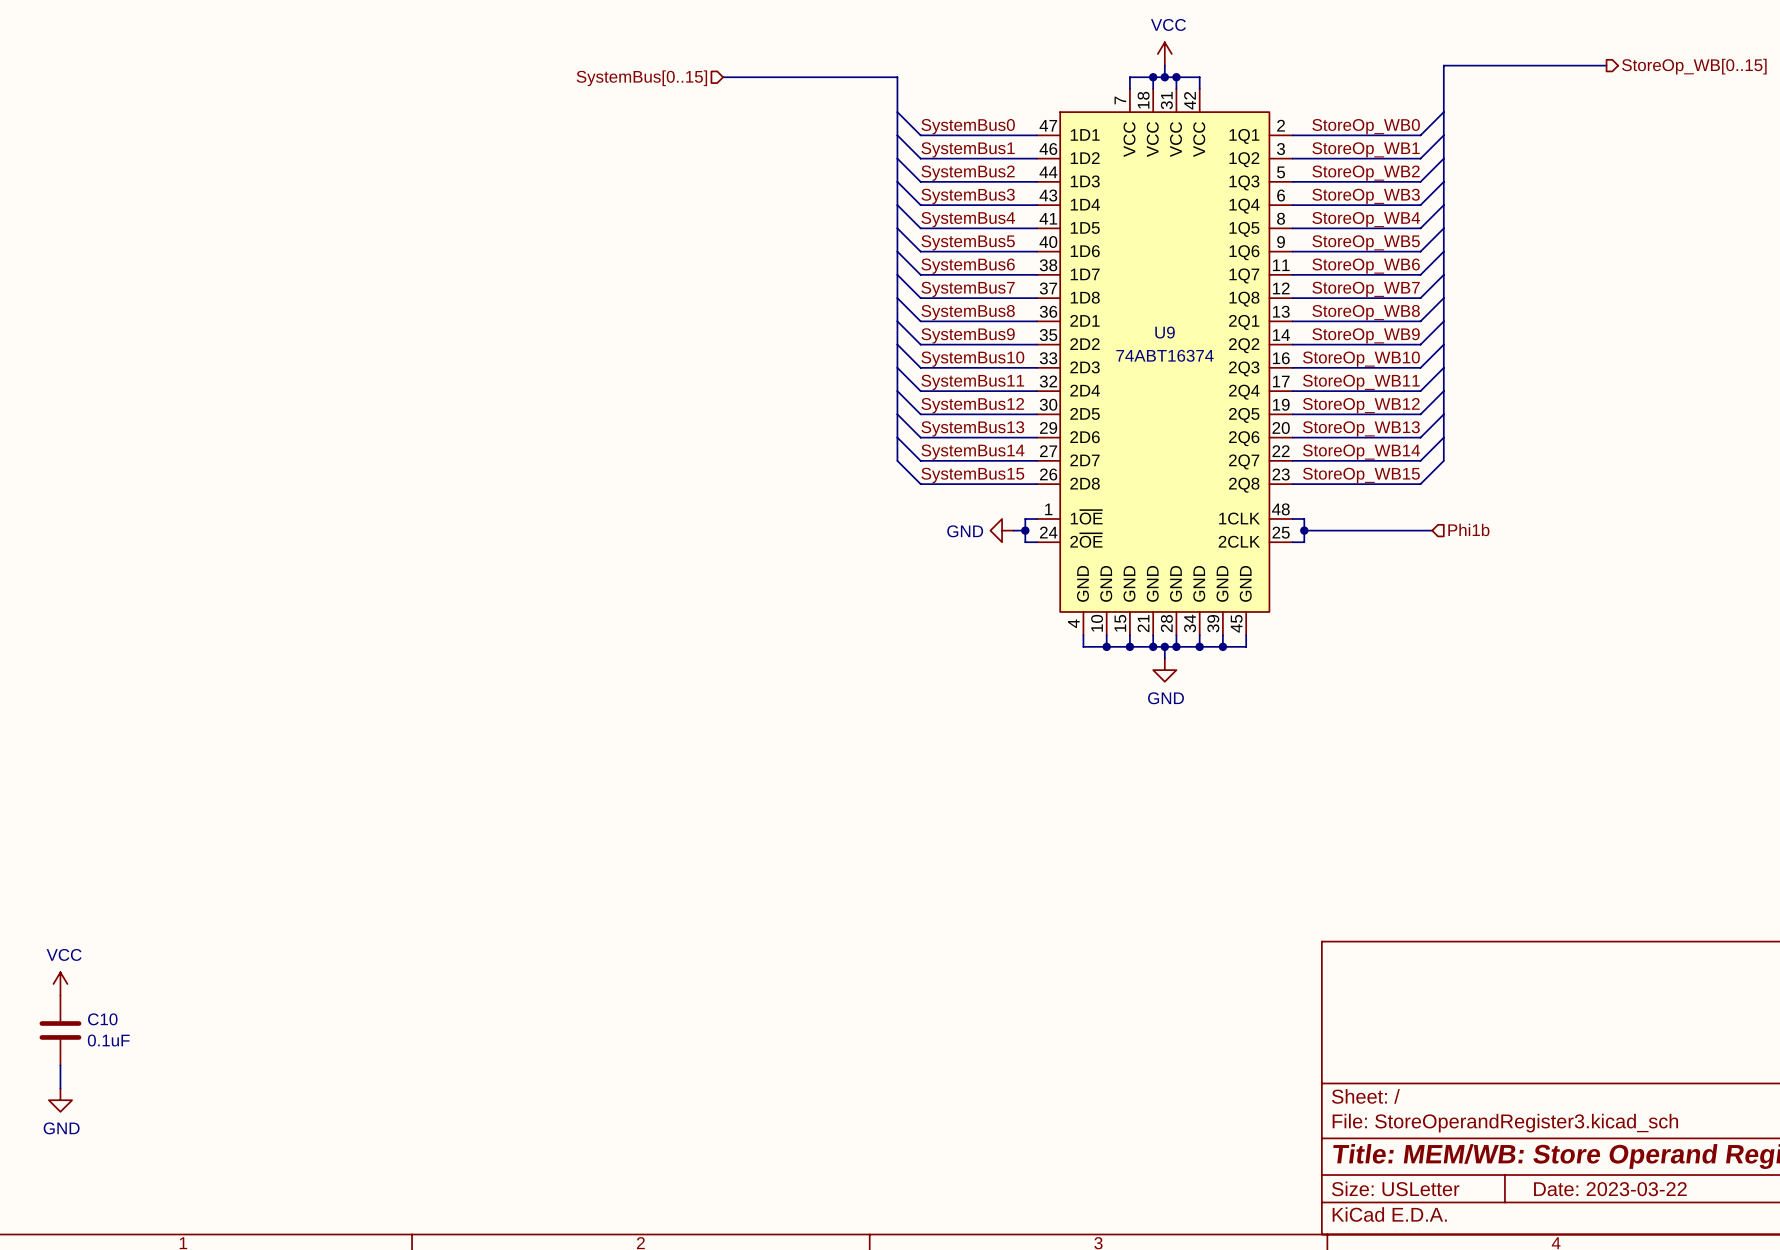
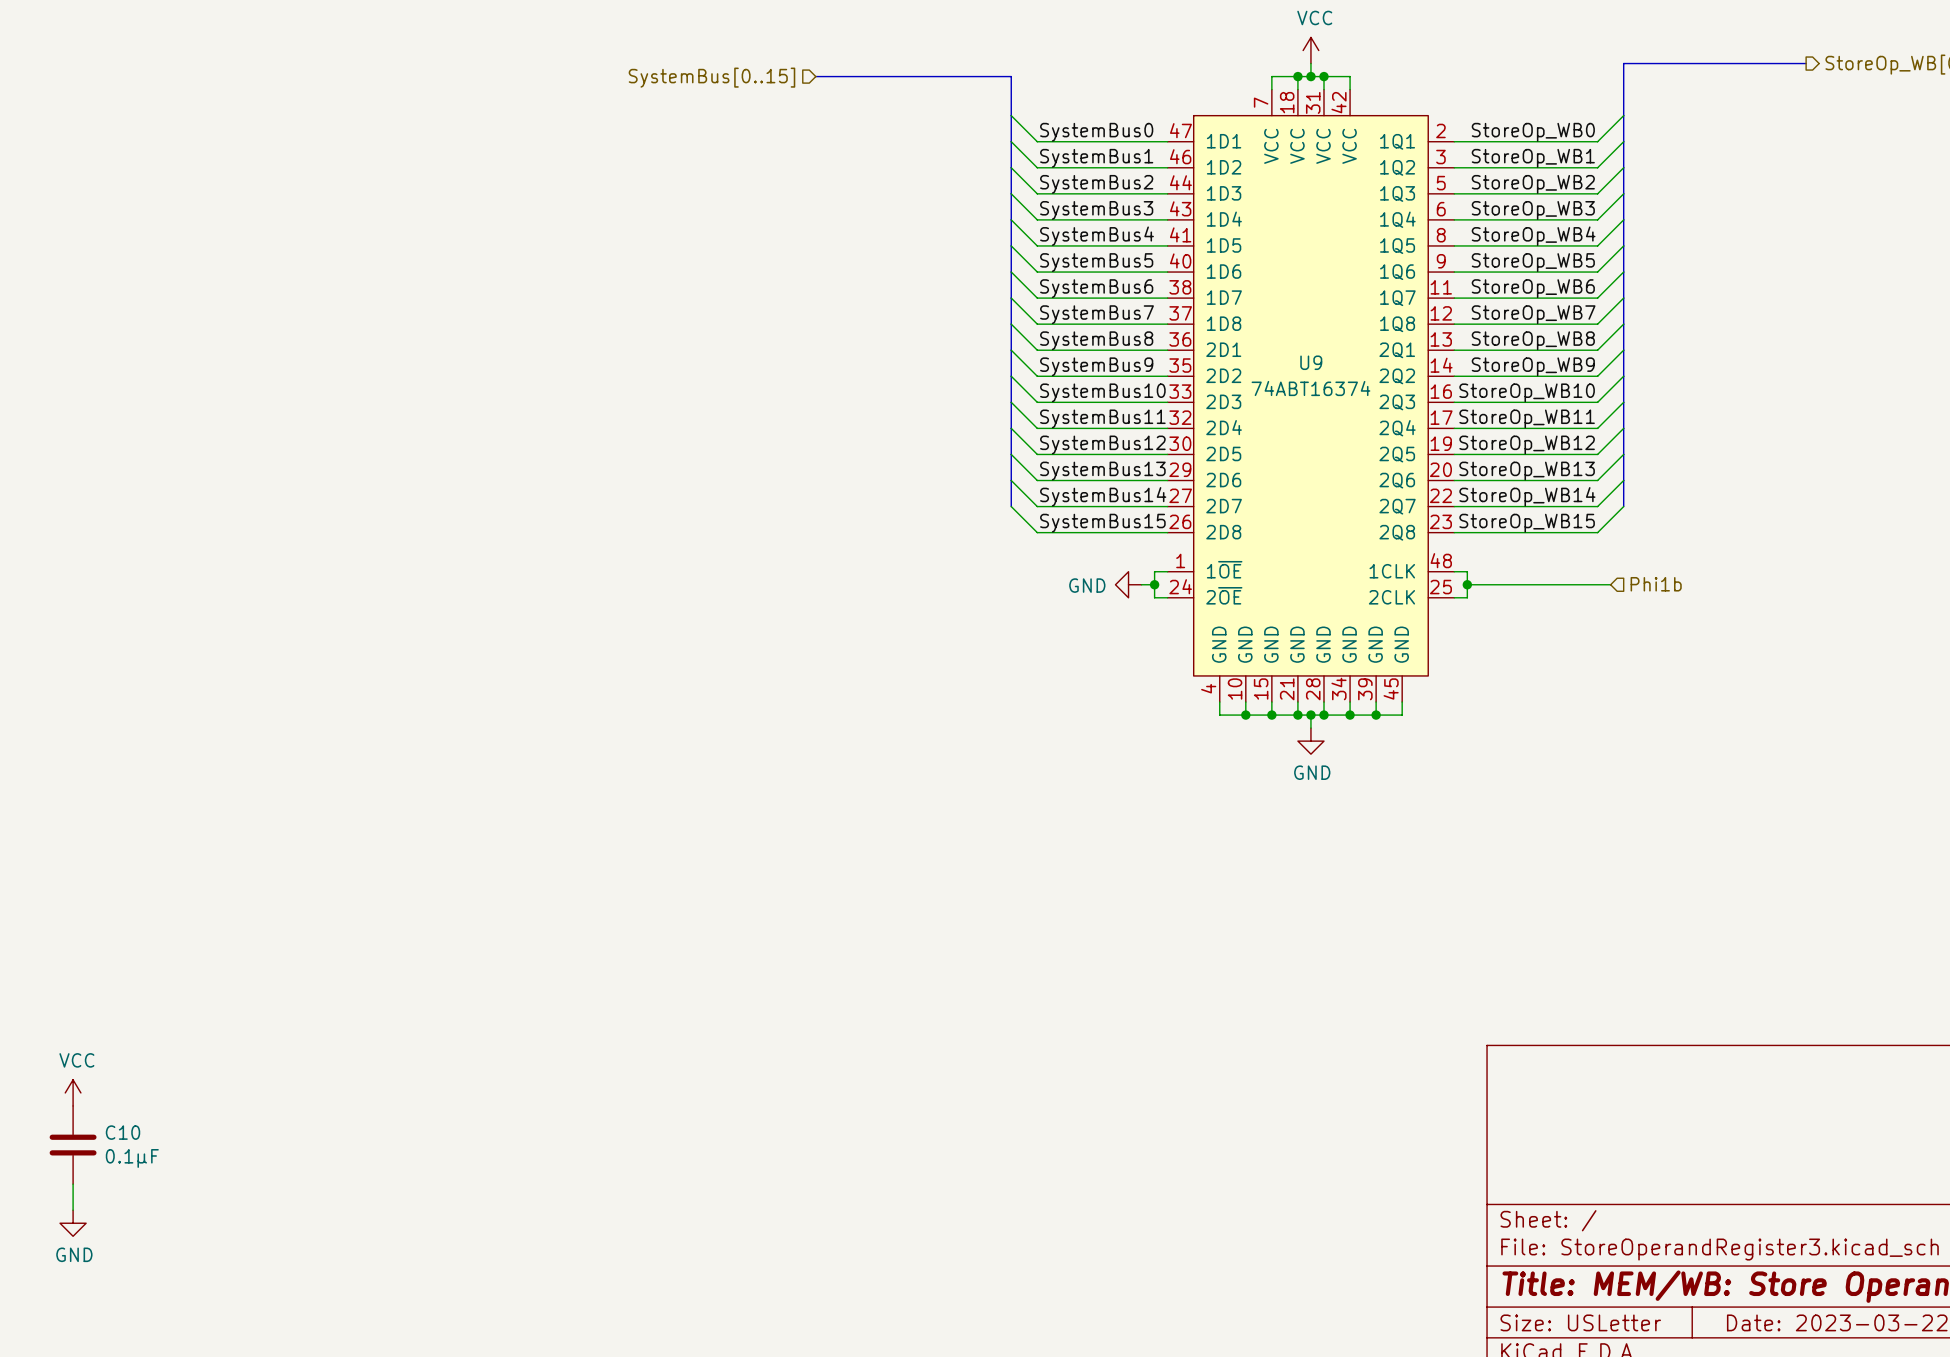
C10 value: 0.1uF (108, 1040) -> 0.1μF (132, 1158)

